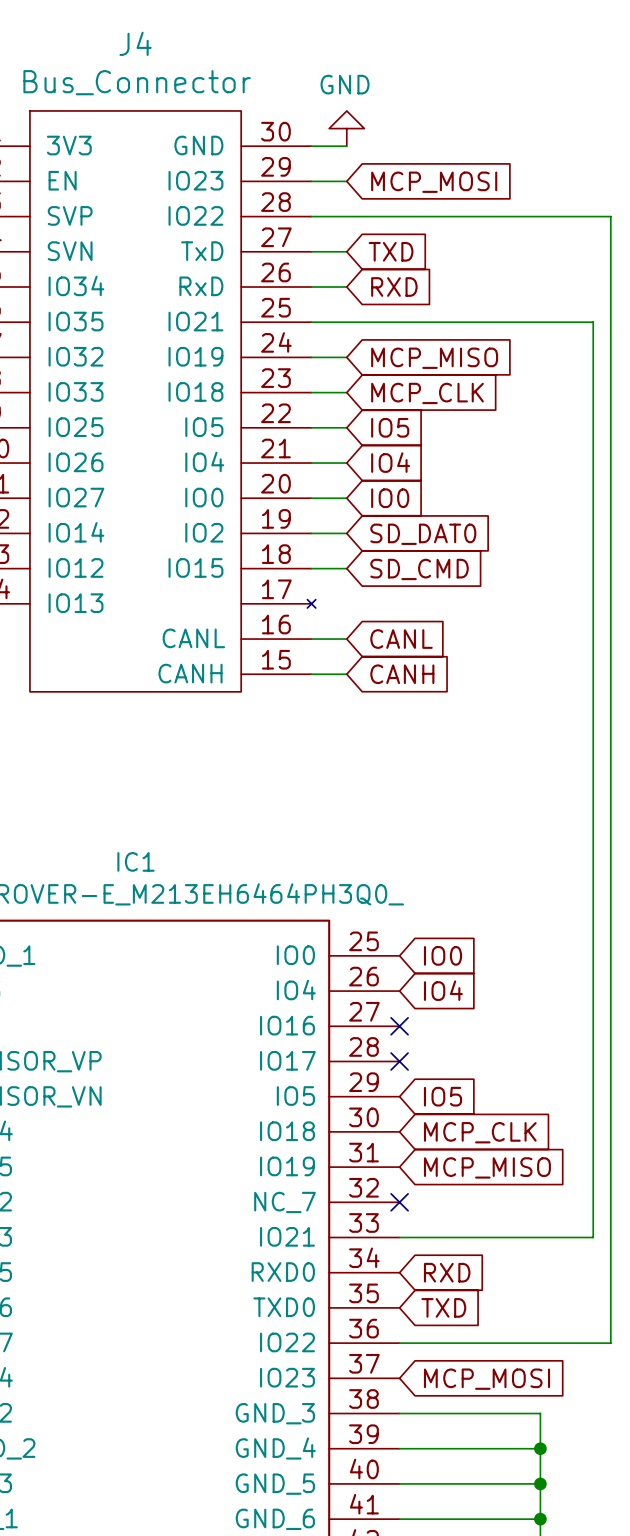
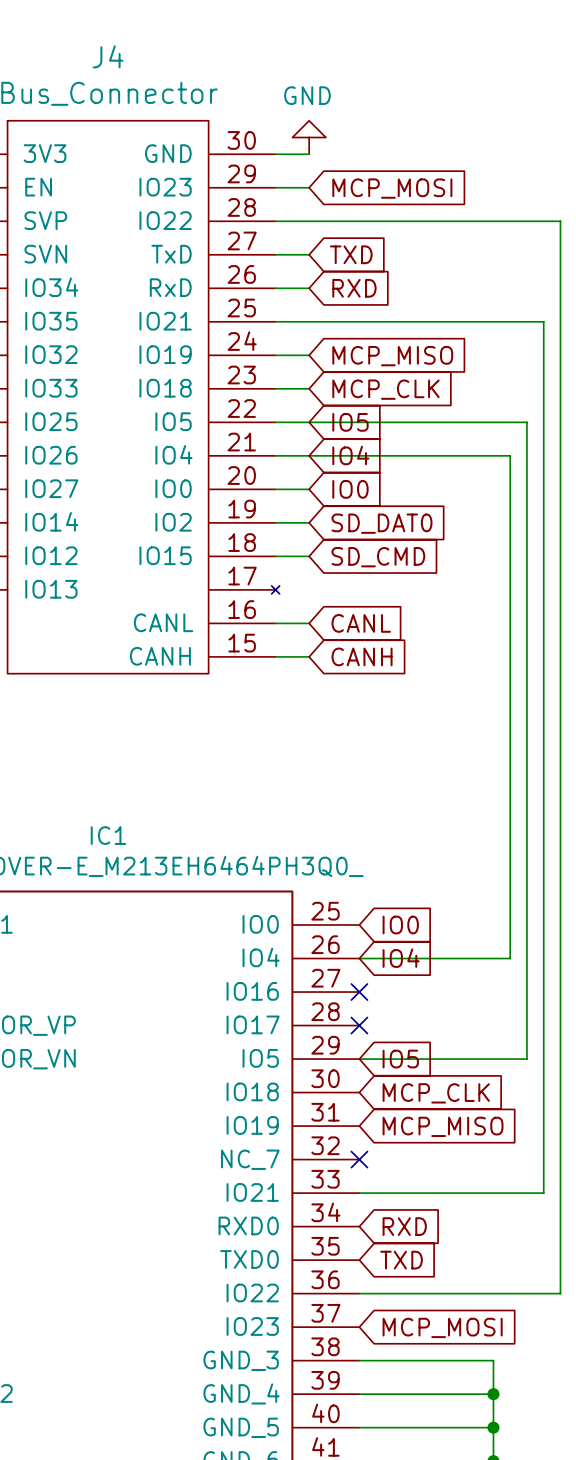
wire: none -> (309, 422) (526, 422) (526, 1059) (359, 1059)
wire: none -> (309, 455) (510, 455) (510, 958) (359, 958)

